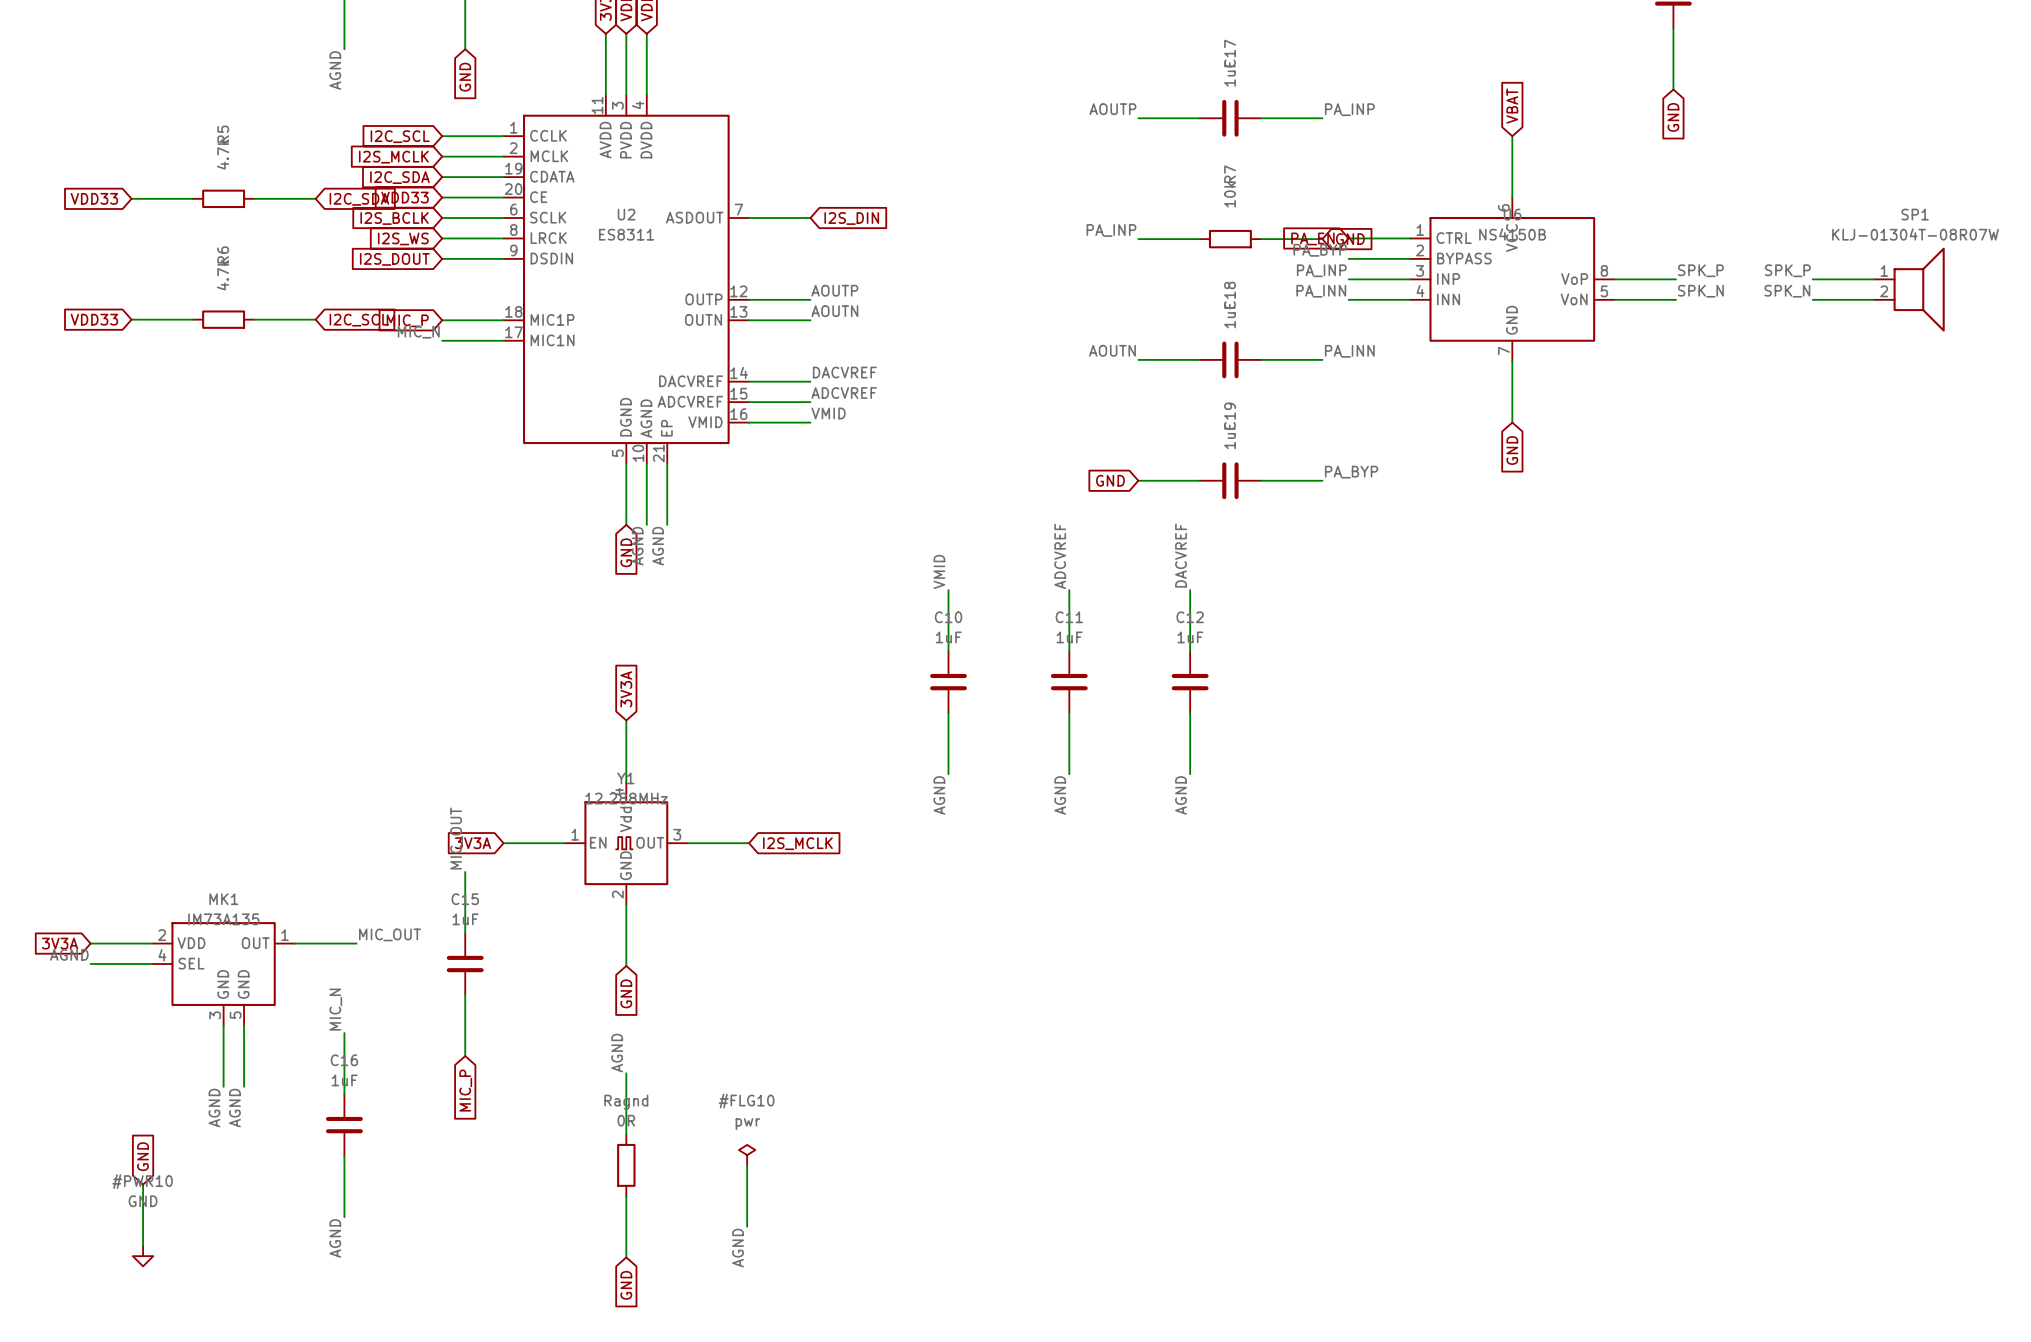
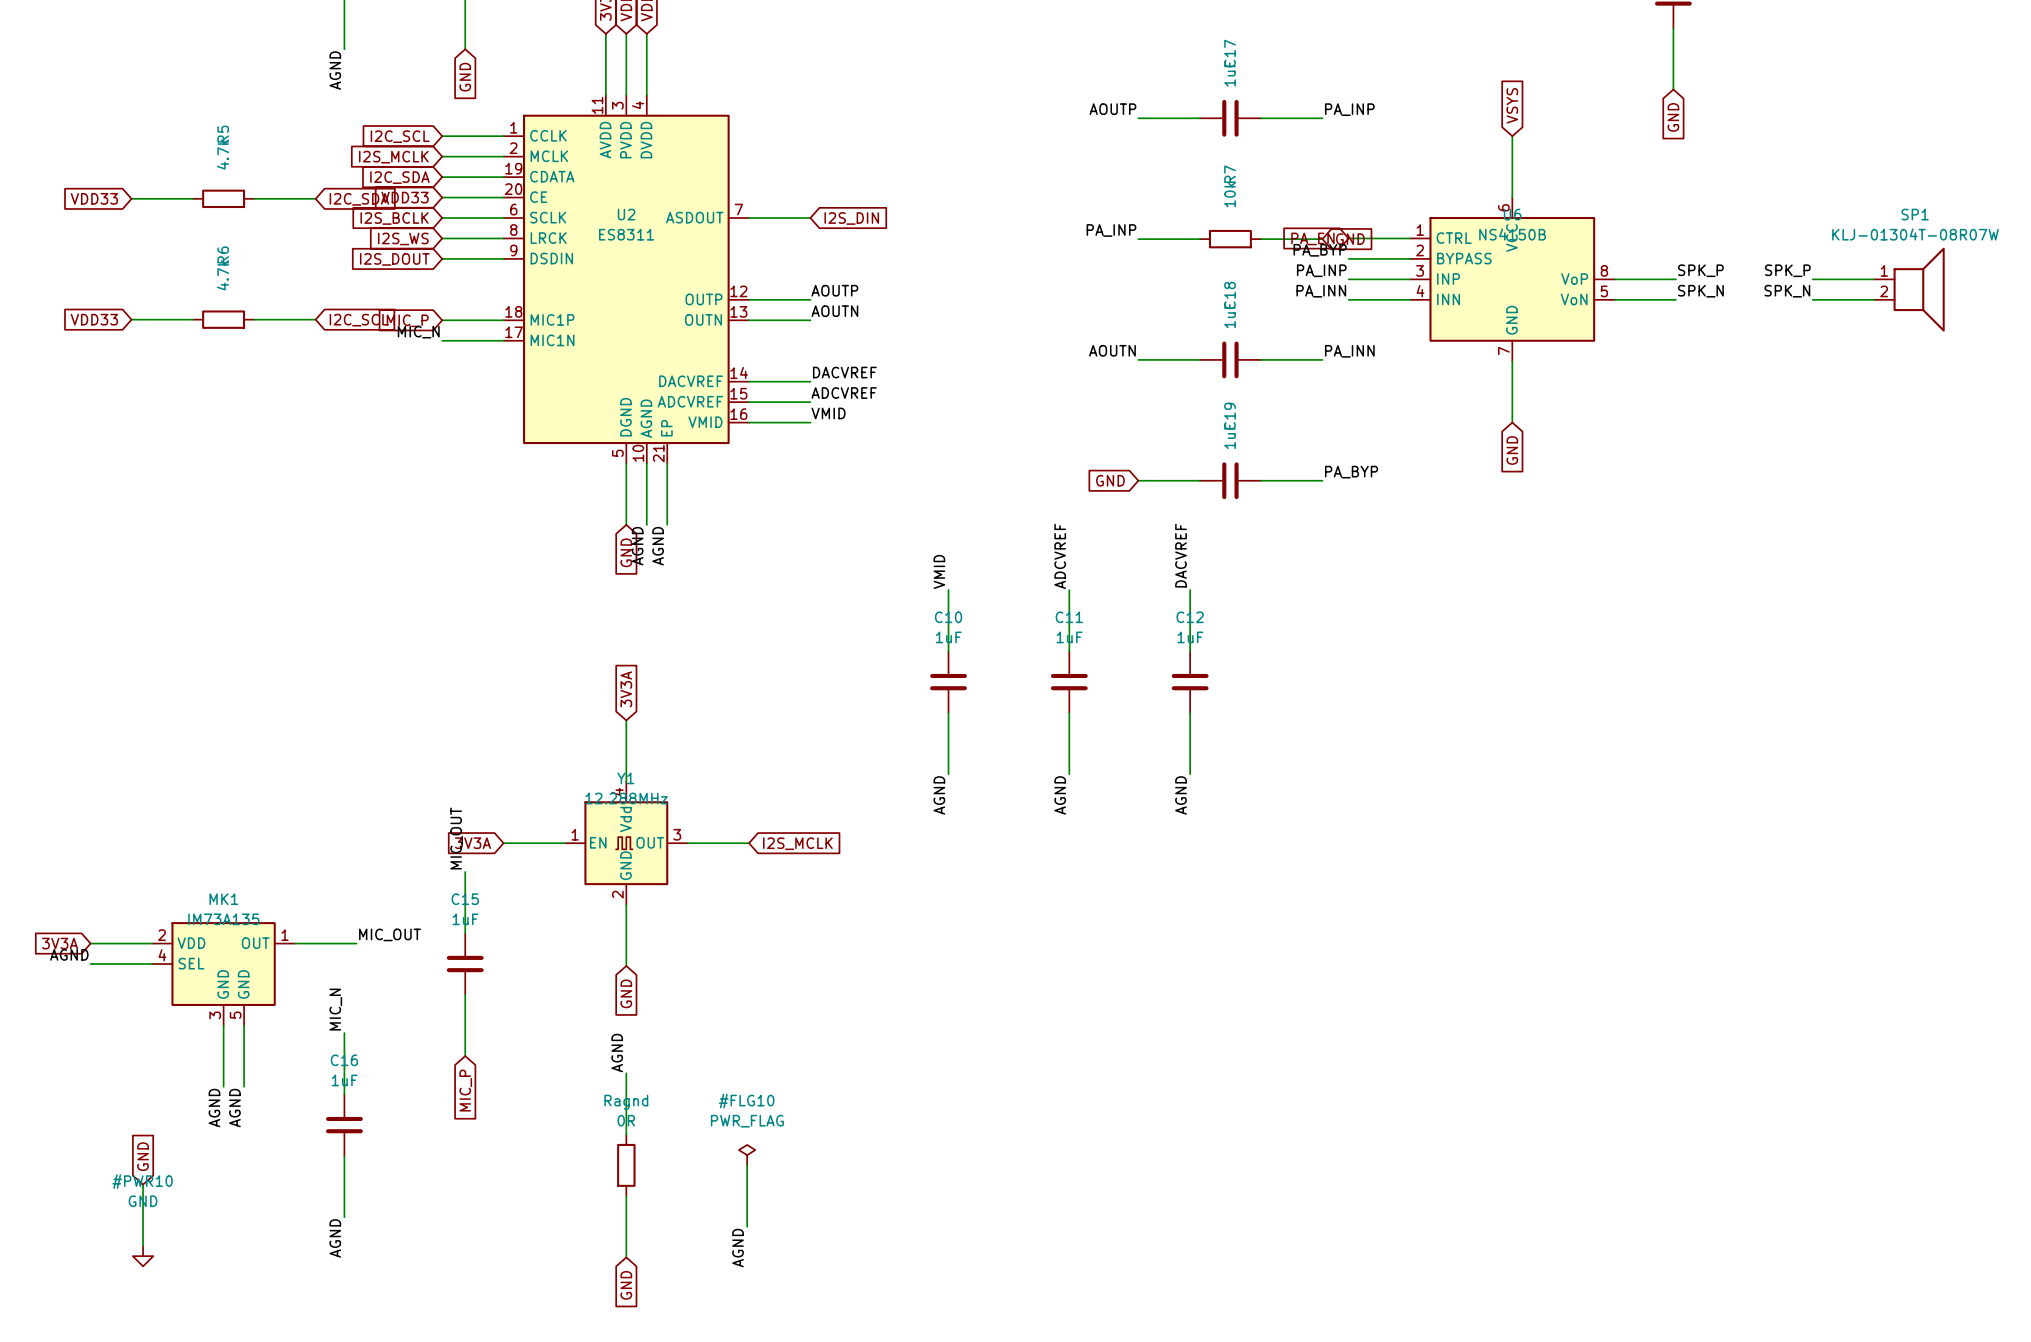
global label: VBAT (1512, 106) -> VSYS (1512, 105)
power symbol: pwr (747, 1155) -> PWR_FLAG (747, 1155)

